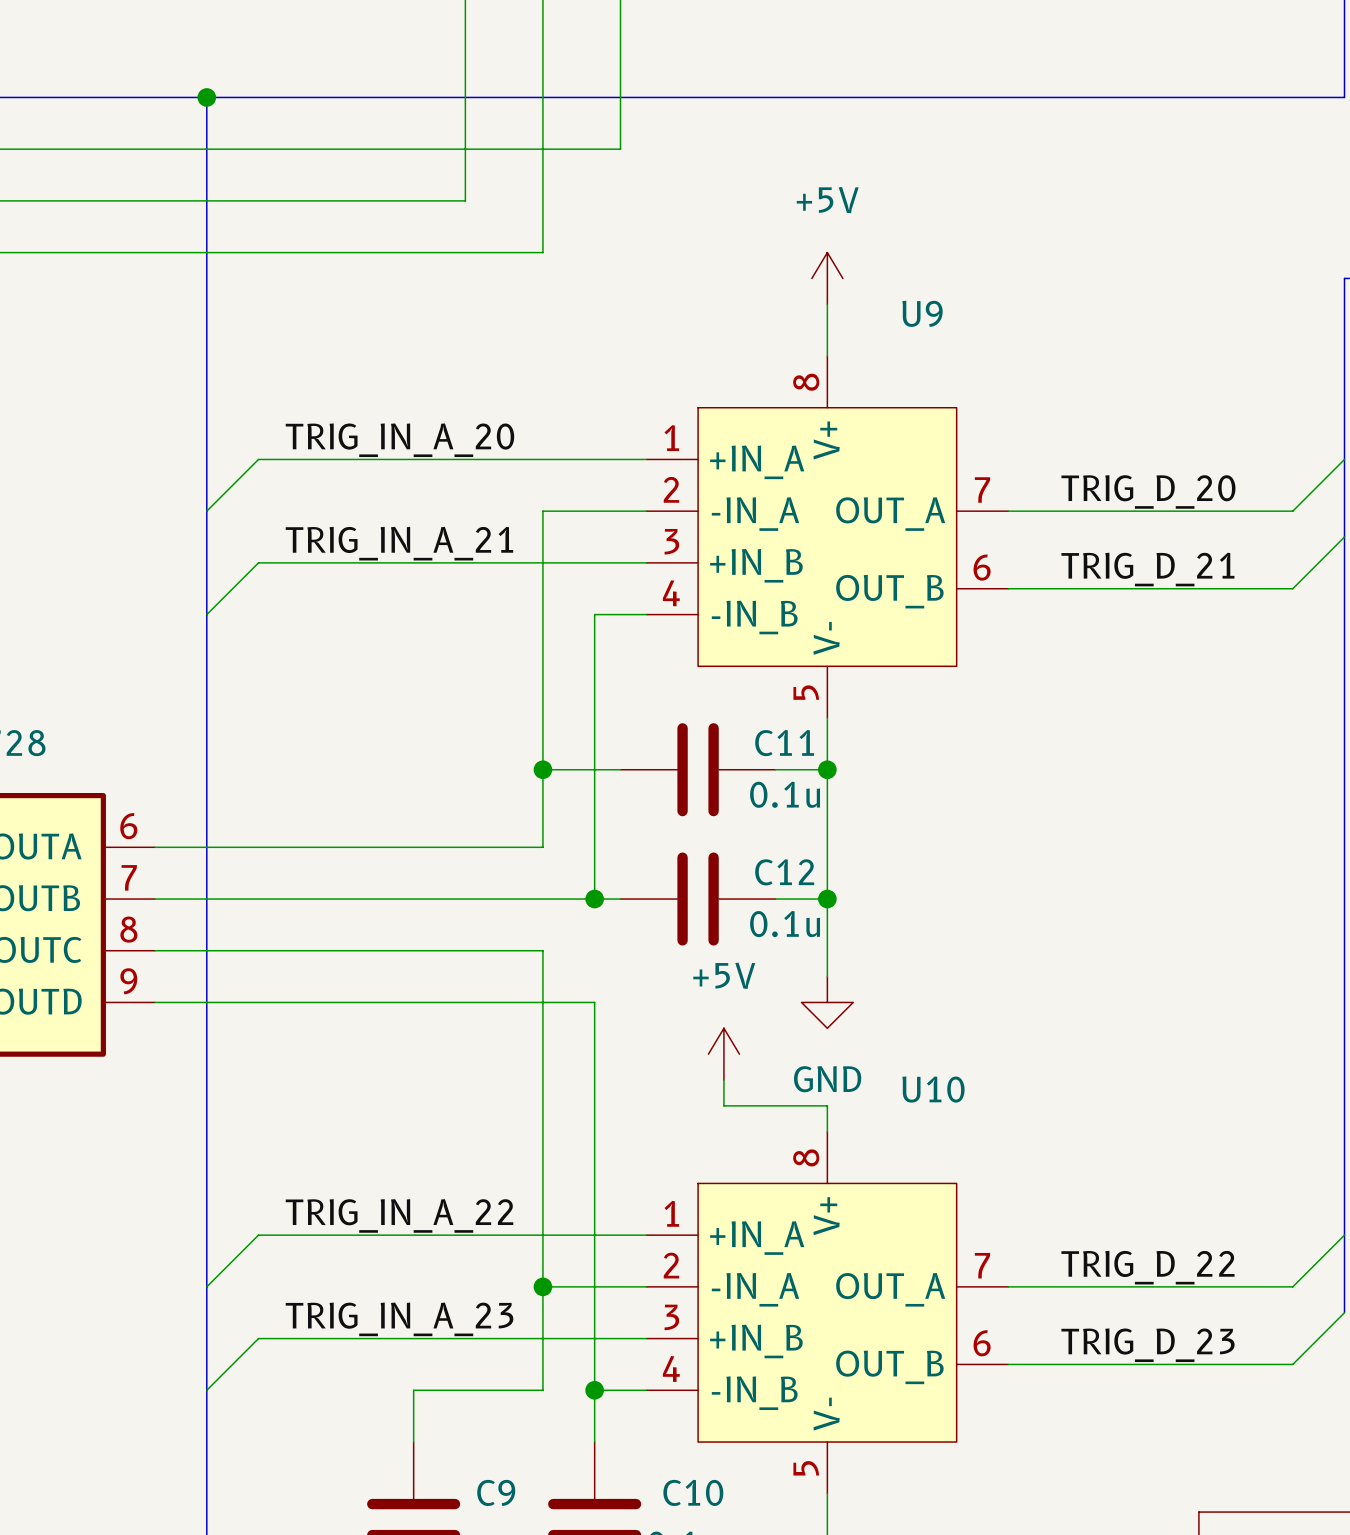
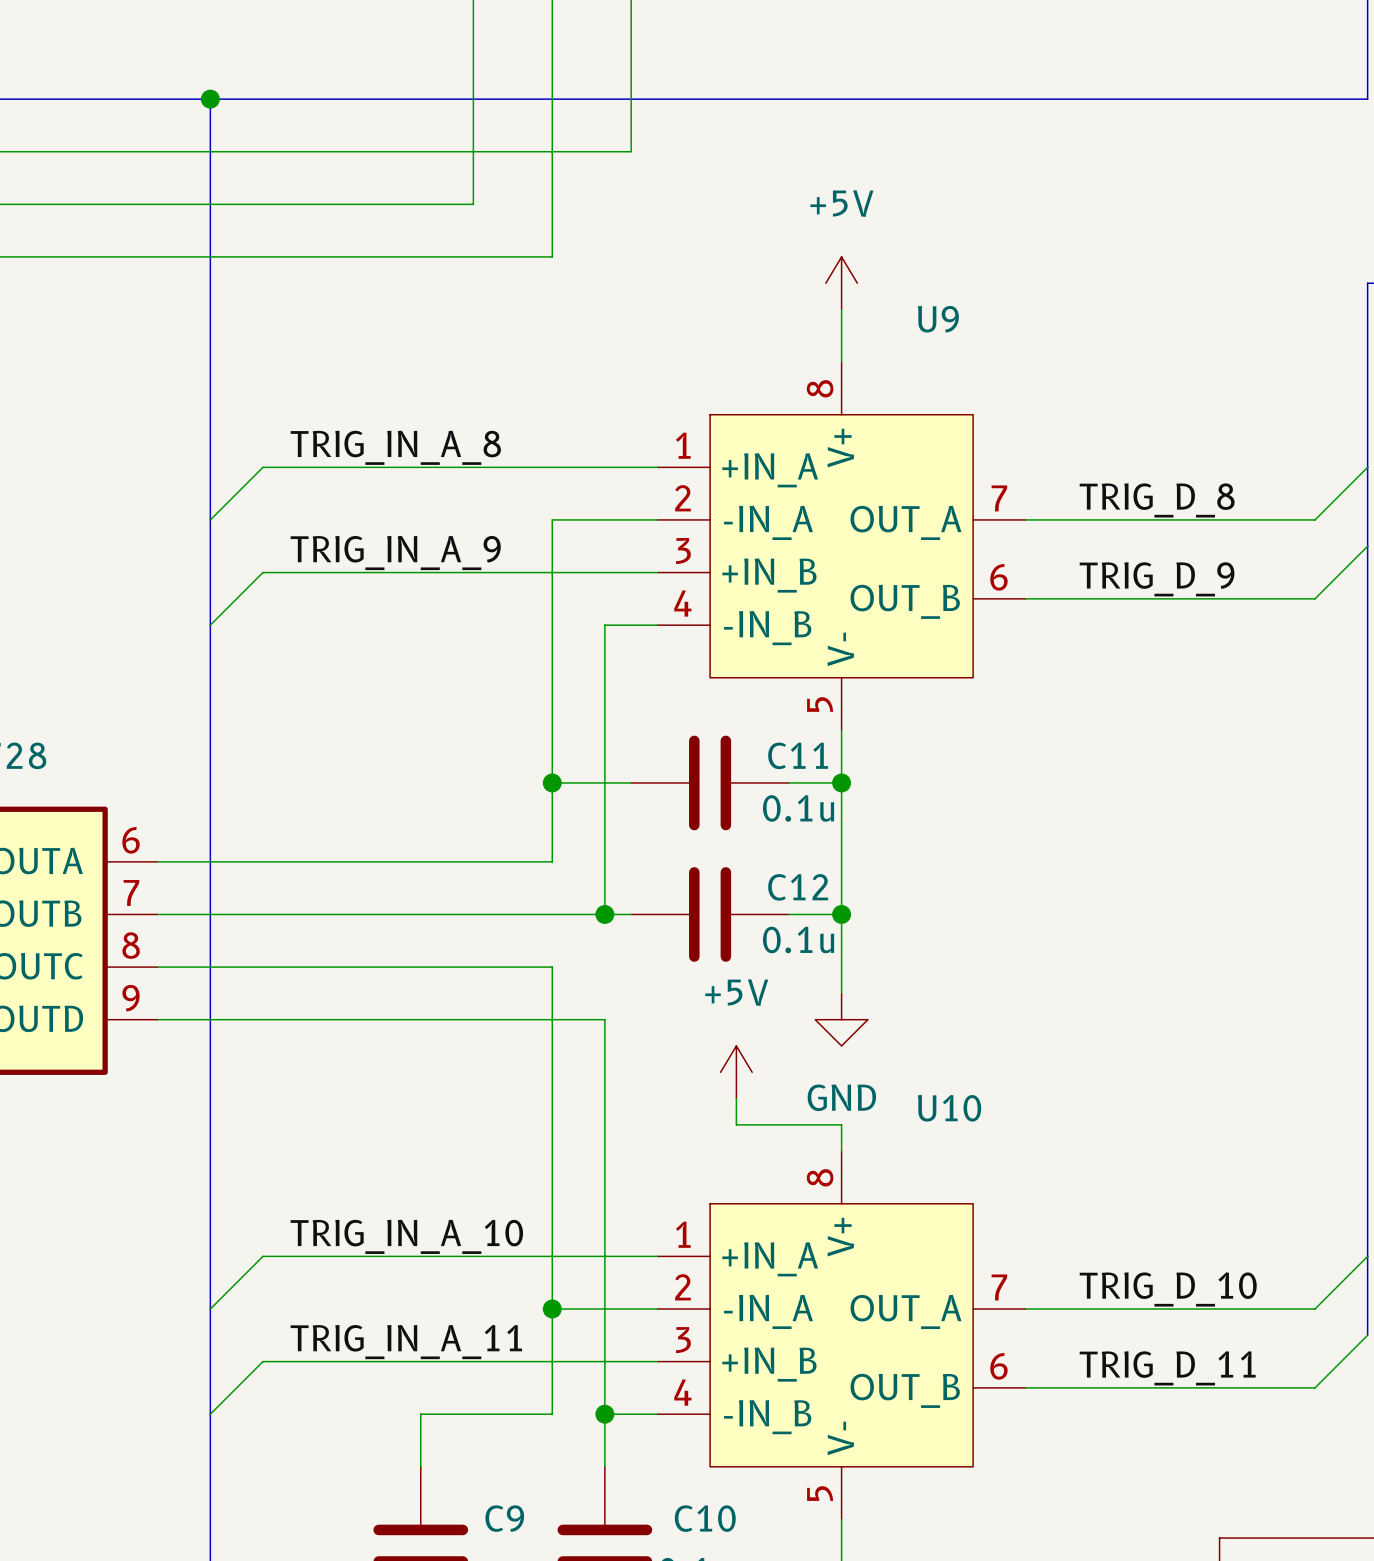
label: TRIG_IN_A_20 (399, 440) -> TRIG_IN_A_8 (395, 447)
label: TRIG_D_20 (1148, 491) -> TRIG_D_8 (1157, 500)
label: TRIG_IN_A_21 (399, 543) -> TRIG_IN_A_9 (395, 553)
label: TRIG_D_21 (1147, 569) -> TRIG_D_9 (1157, 579)
label: TRIG_IN_A_22 (399, 1215) -> TRIG_IN_A_10 (406, 1236)
label: TRIG_D_22 (1147, 1267) -> TRIG_D_10 (1168, 1289)
label: TRIG_IN_A_23 (399, 1319) -> TRIG_IN_A_11 (406, 1342)
label: TRIG_D_23 (1148, 1345) -> TRIG_D_11 (1167, 1368)

